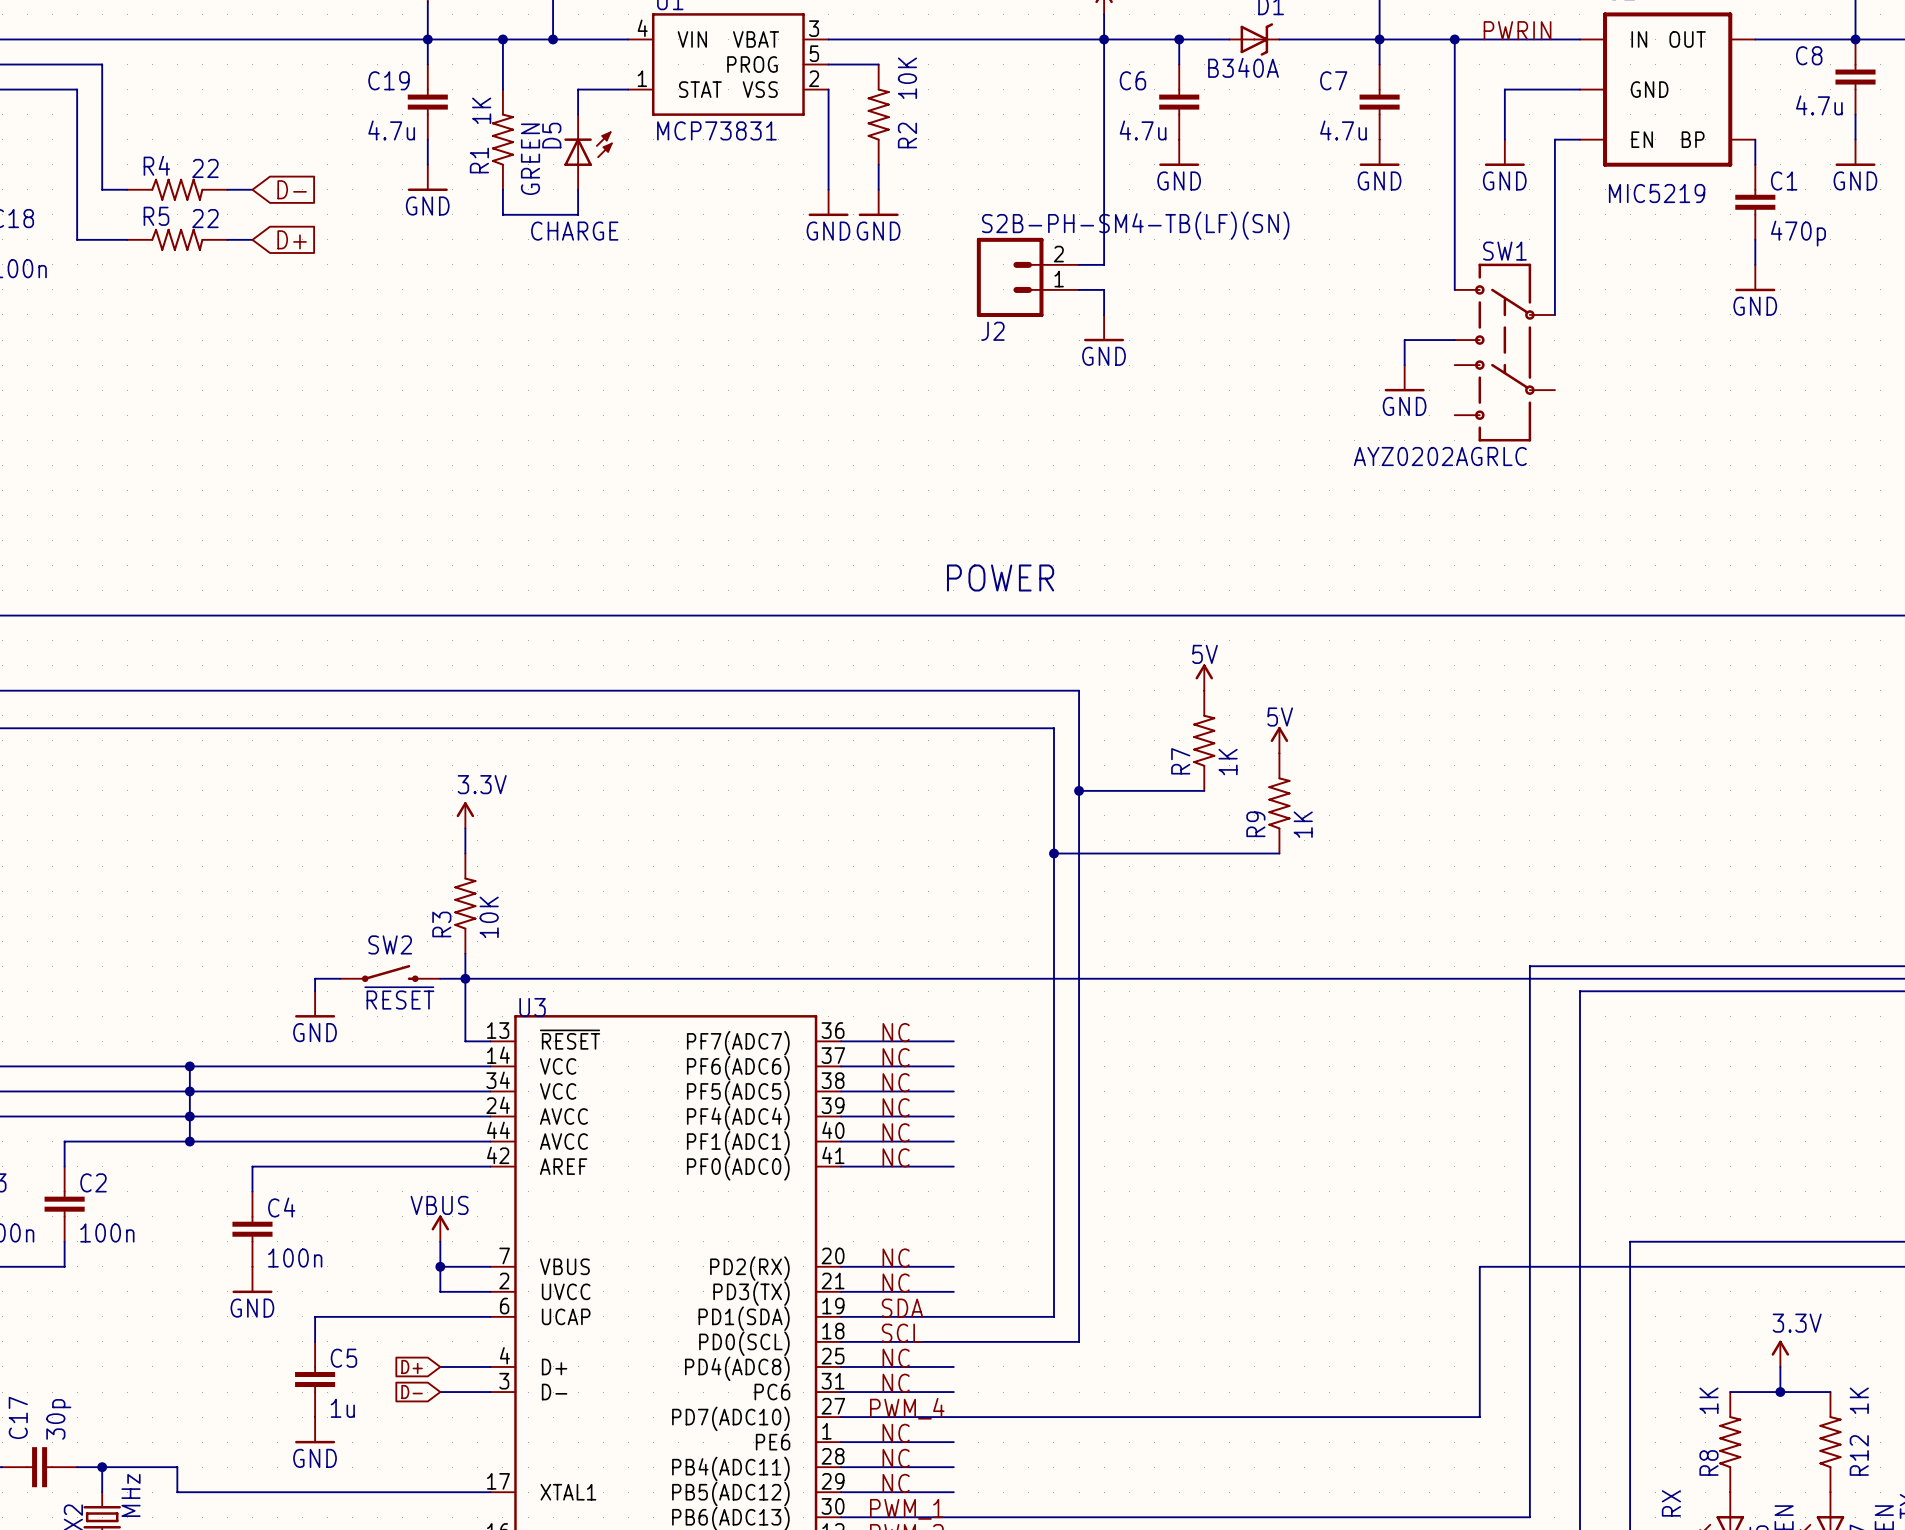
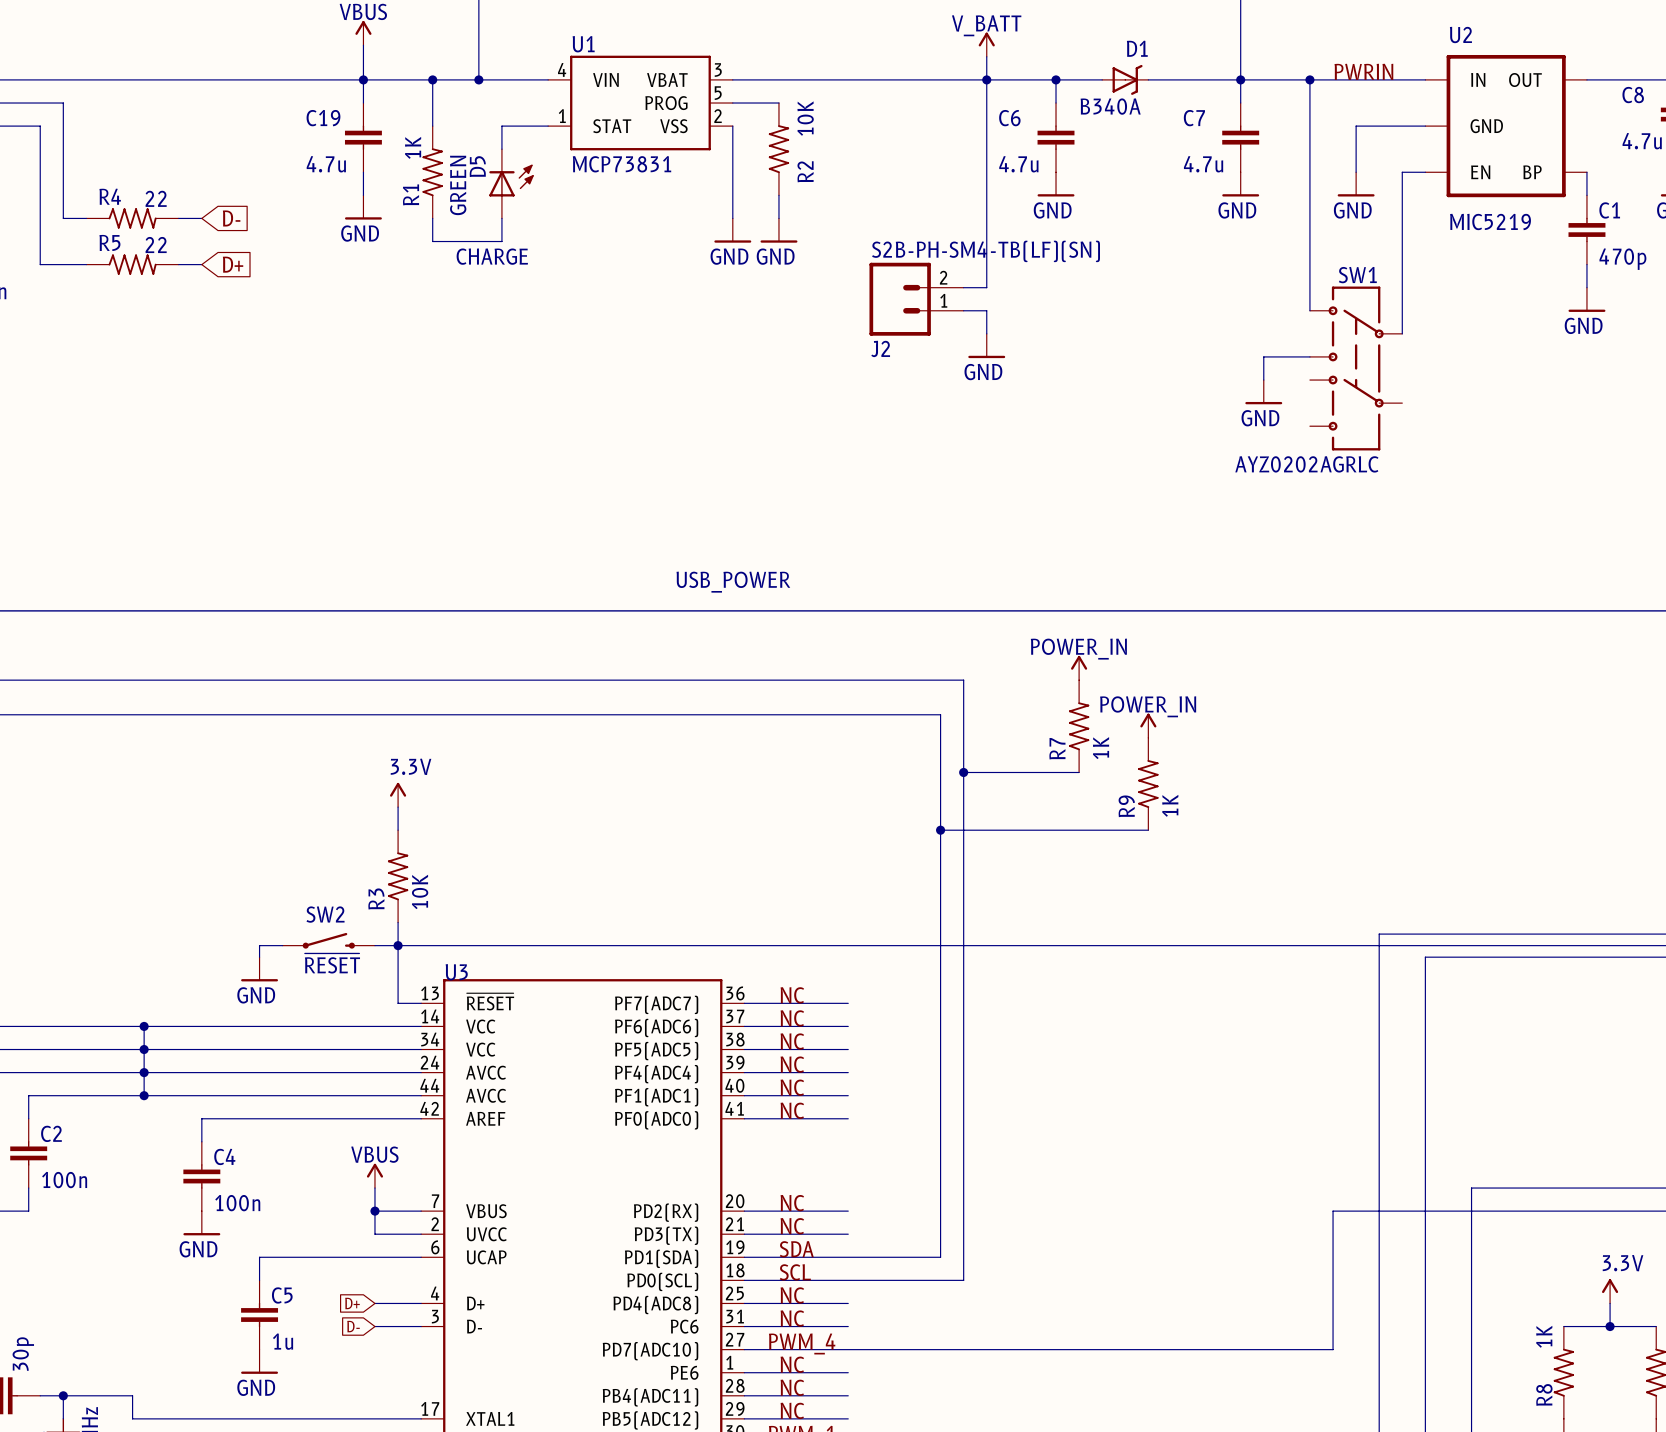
text: POWER (1000, 577) -> none
text: none -> USB_POWER (733, 582)
power symbol: 5V (1204, 677) -> POWER_IN (1079, 668)
power symbol: 5V (1279, 740) -> POWER_IN (1148, 725)

